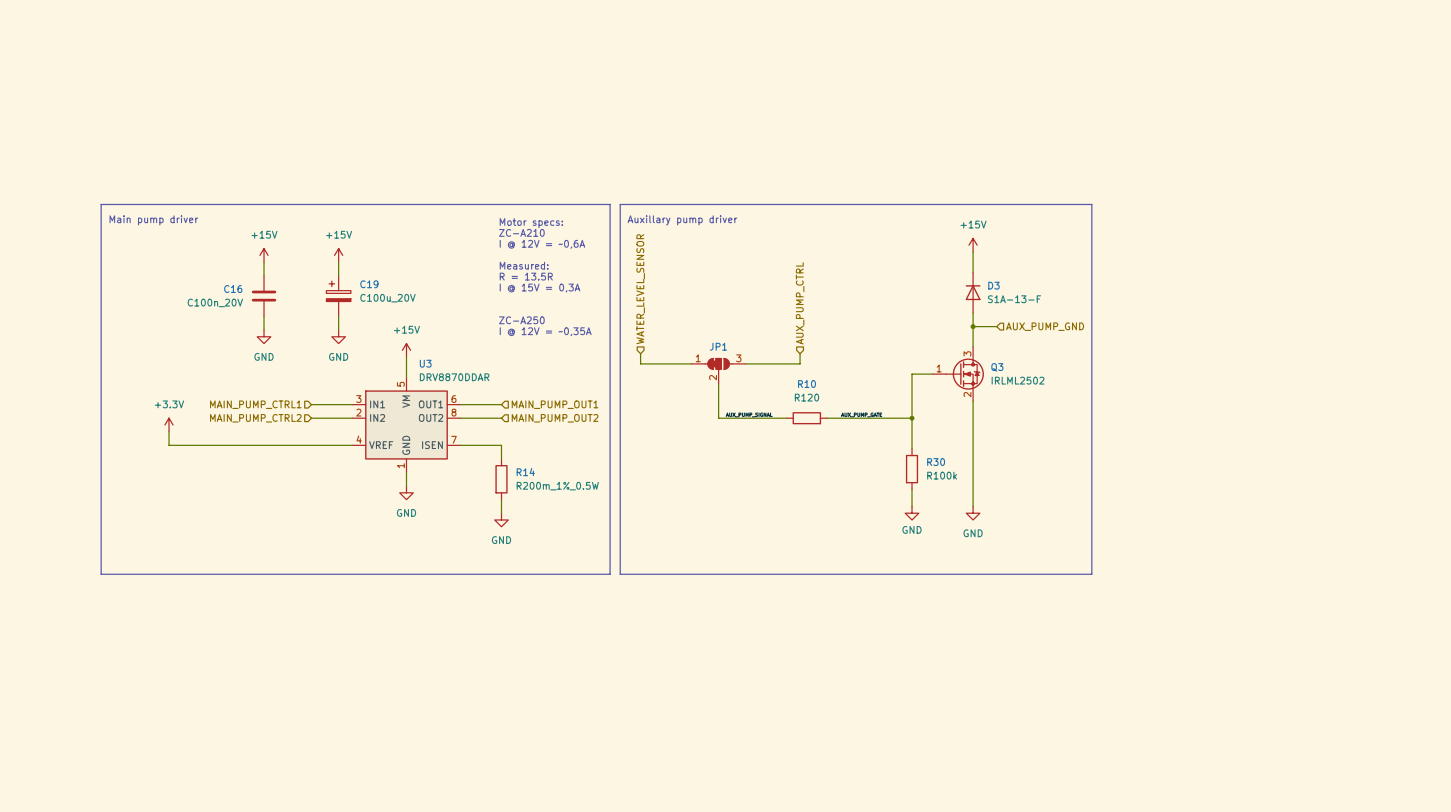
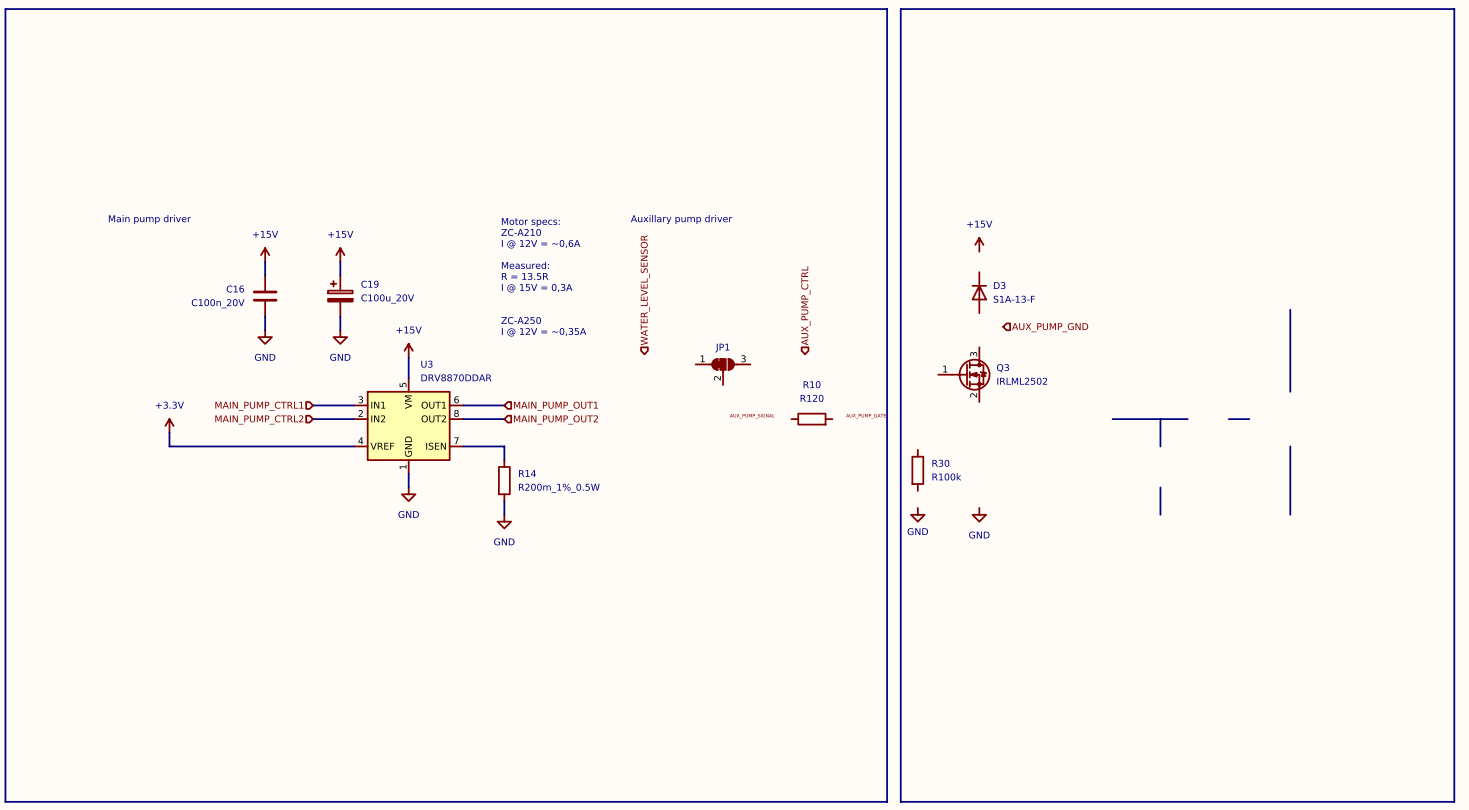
line: none -> (5, 9) (887, 9) (887, 801) (5, 801) (5, 9)
line: none -> (900, 9) (1454, 9) (1454, 801) (900, 801) (900, 9)
line: (101, 204) (610, 204) (610, 574) (101, 574) (101, 204) -> none
line: (620, 204) (1091, 204) (1091, 574) (620, 574) (620, 204) -> none
wire: (973, 251) (973, 272) -> none
wire: none -> (1290, 309) (1290, 391)
wire: (973, 313) (973, 346) -> none
wire: (973, 326) (996, 326) -> none
junction: (973, 326) -> none
wire: (640, 353) (640, 363) (691, 363) -> none
wire: (800, 353) (800, 363) (745, 363) -> none
wire: (932, 374) (912, 374) (912, 448) -> none
wire: (718, 384) (718, 418) (786, 418) -> none
wire: (973, 401) (973, 506) -> none
wire: (827, 418) (912, 418) -> none
junction: (912, 418) -> none
wire: none -> (1112, 419) (1187, 419)
wire: none -> (1160, 419) (1160, 446)
wire: none -> (1228, 419) (1249, 419)
wire: none -> (1290, 446) (1290, 514)
wire: none -> (1160, 487) (1160, 514)
wire: (912, 489) (912, 506) -> none

